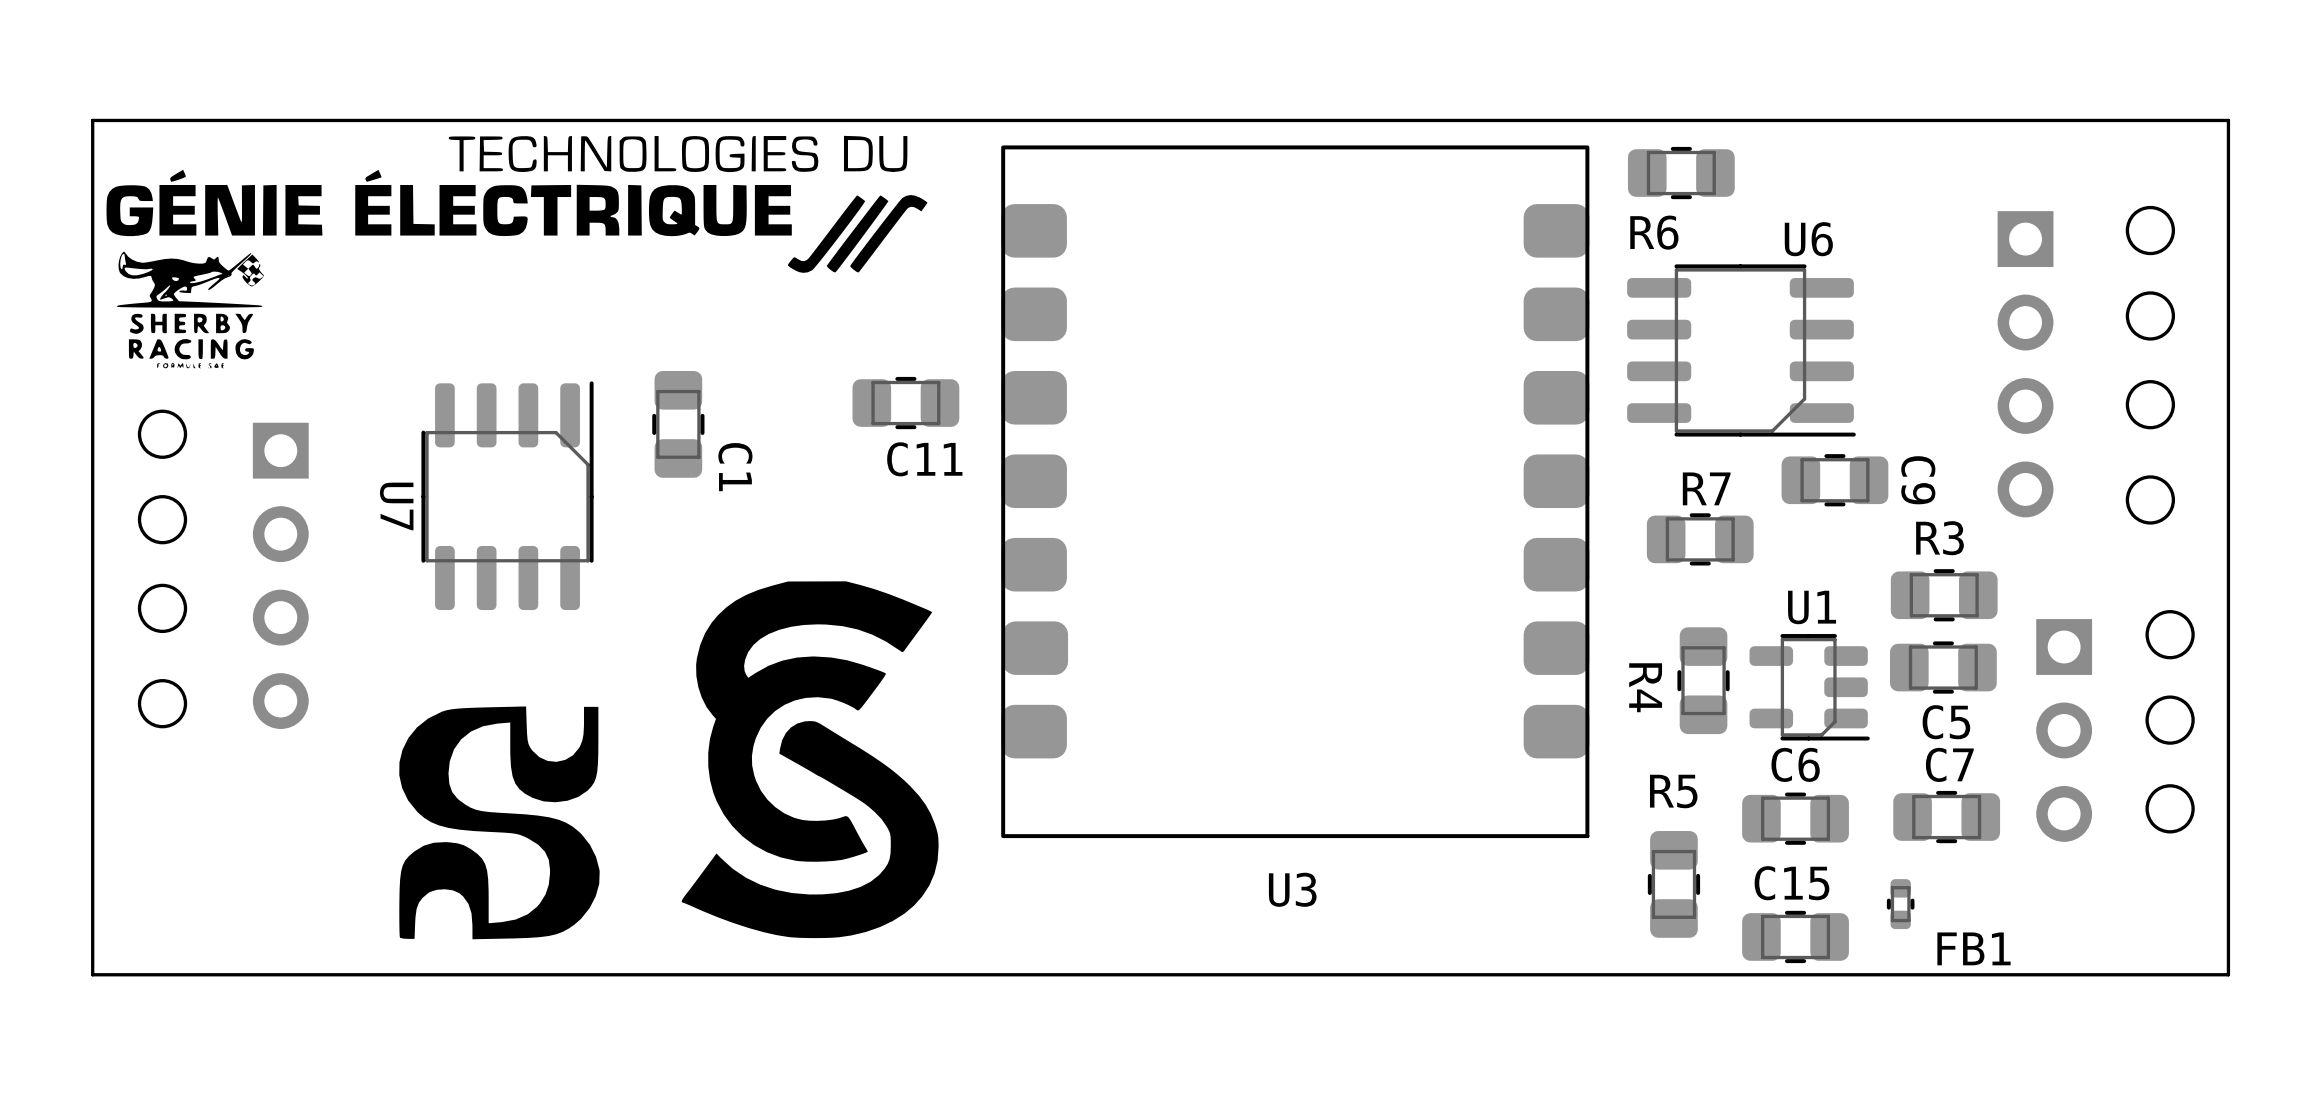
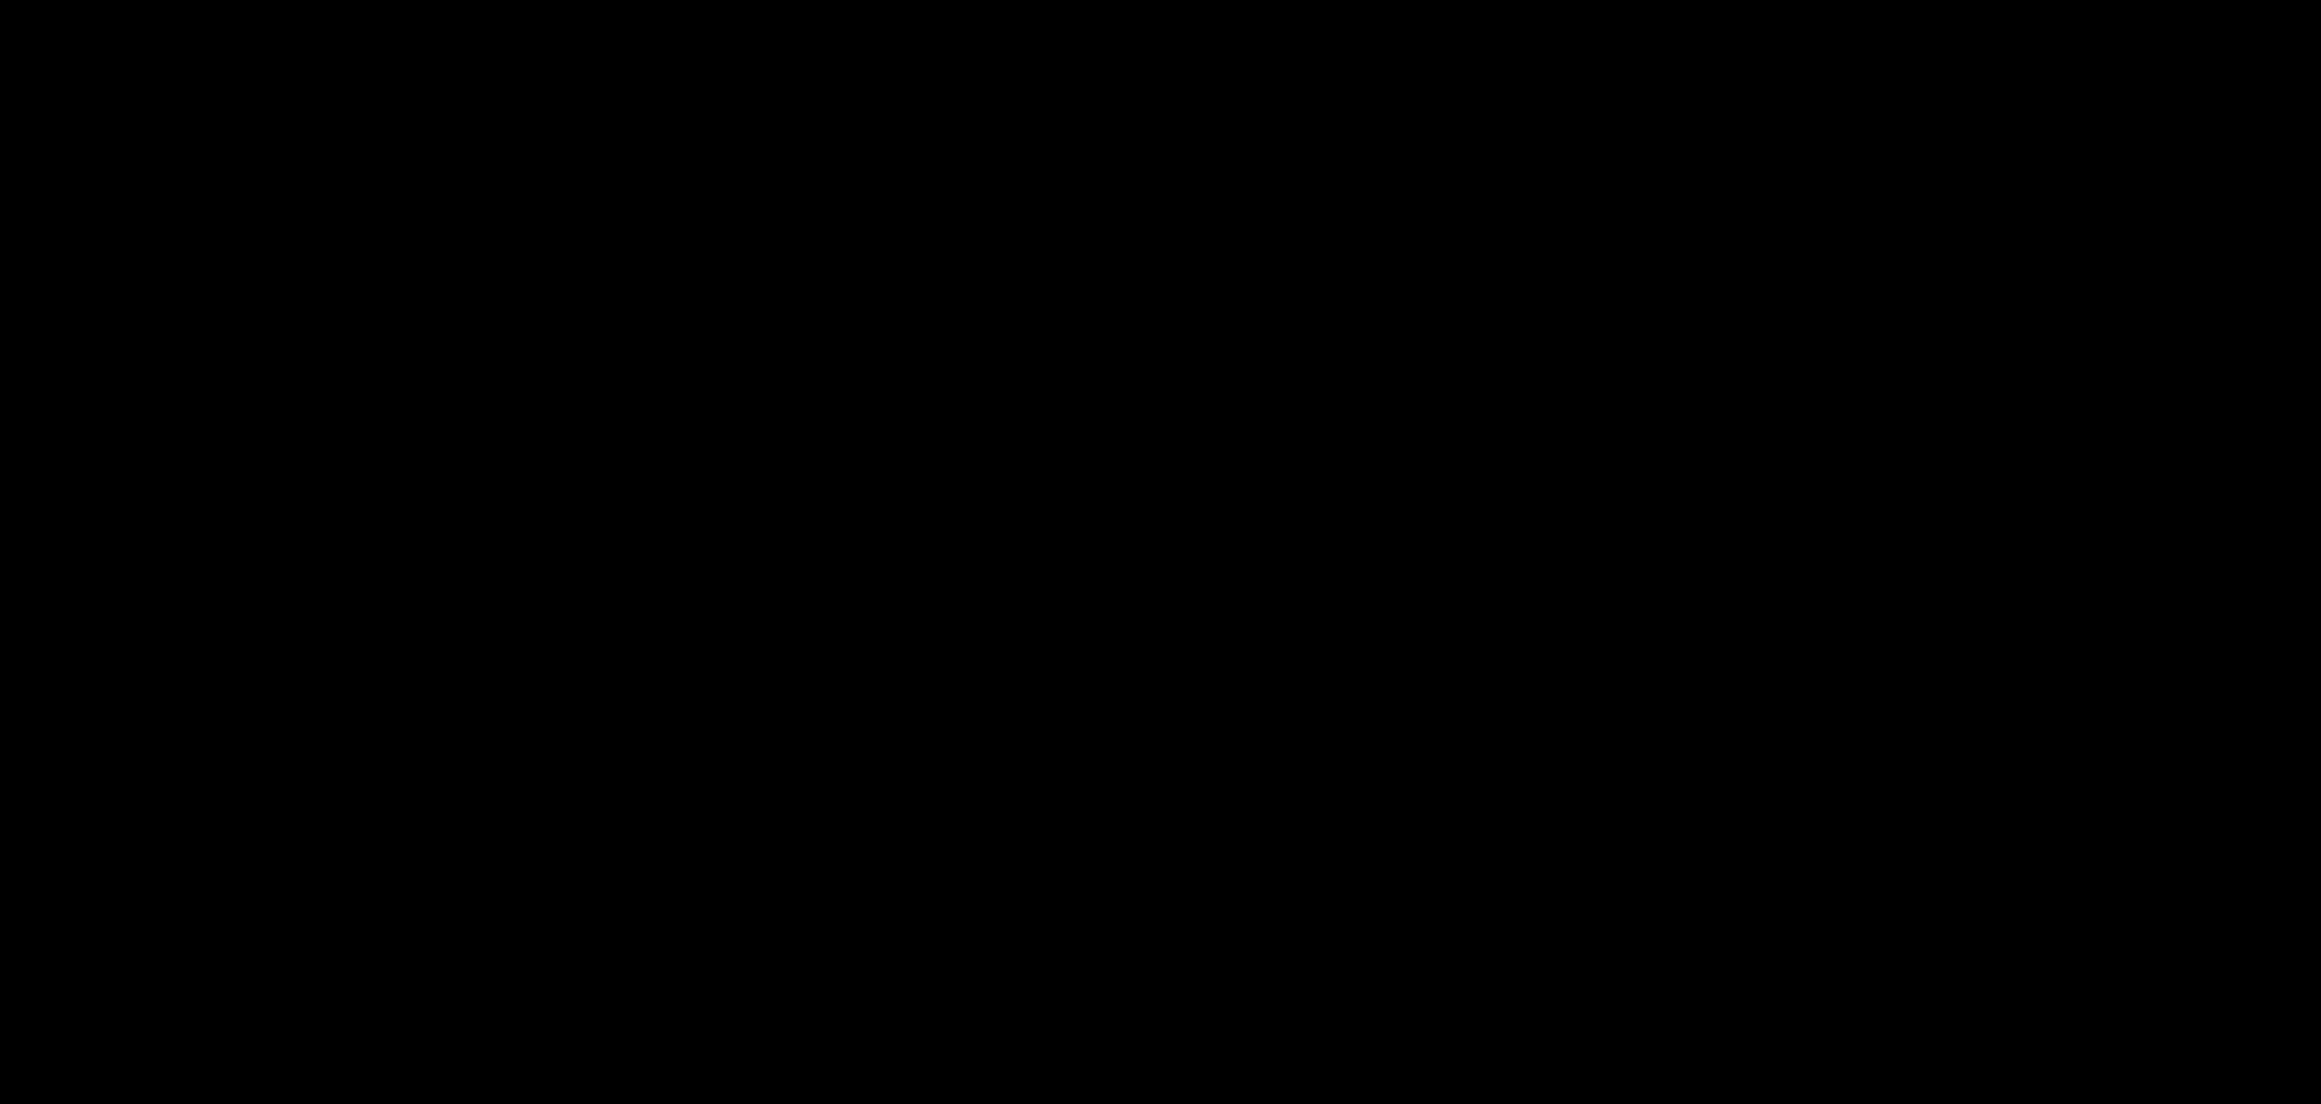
board edge: (2228, 120) (92, 120) (92, 974) (2228, 974) (2228, 120) -> none
drawing: [106, 135, 928, 369] -> none
R6: (1681, 173) -> none
round board edge: [2125, 205, 2176, 256] -> none
round board edge: [2125, 291, 2176, 341] -> none
U6: (1741, 350) -> none
part: (2025, 364) -> none
round board edge: [2125, 380, 2176, 430] -> none
C11: (905, 403) -> none
round board edge: [137, 409, 188, 459] -> none
C1: (678, 424) -> none
round board edge: [2125, 475, 2176, 525] -> none
C9: (1834, 480) -> none
U3: (1295, 491) -> none
round board edge: [137, 495, 188, 545] -> none
U7: (507, 495) -> none
R7: (1700, 539) -> none
part: (280, 575) -> none
drawing: [681, 581, 939, 939] -> none
round board edge: [137, 583, 188, 634] -> none
R3: (1944, 595) -> none
round board edge: [2145, 610, 2195, 660] -> none
C5: (1943, 667) -> none
round board edge: [137, 679, 188, 729] -> none
R4: (1703, 680) -> none
U1: (1809, 687) -> none
round board edge: [2145, 695, 2195, 745] -> none
drawing: [399, 706, 600, 940] -> none
part: (2064, 730) -> none
round board edge: [2145, 784, 2195, 834] -> none
C7: (1946, 817) -> none
C6: (1795, 818) -> none
R5: (1673, 884) -> none
FB1: (1900, 904) -> none
C15: (1795, 936) -> none

